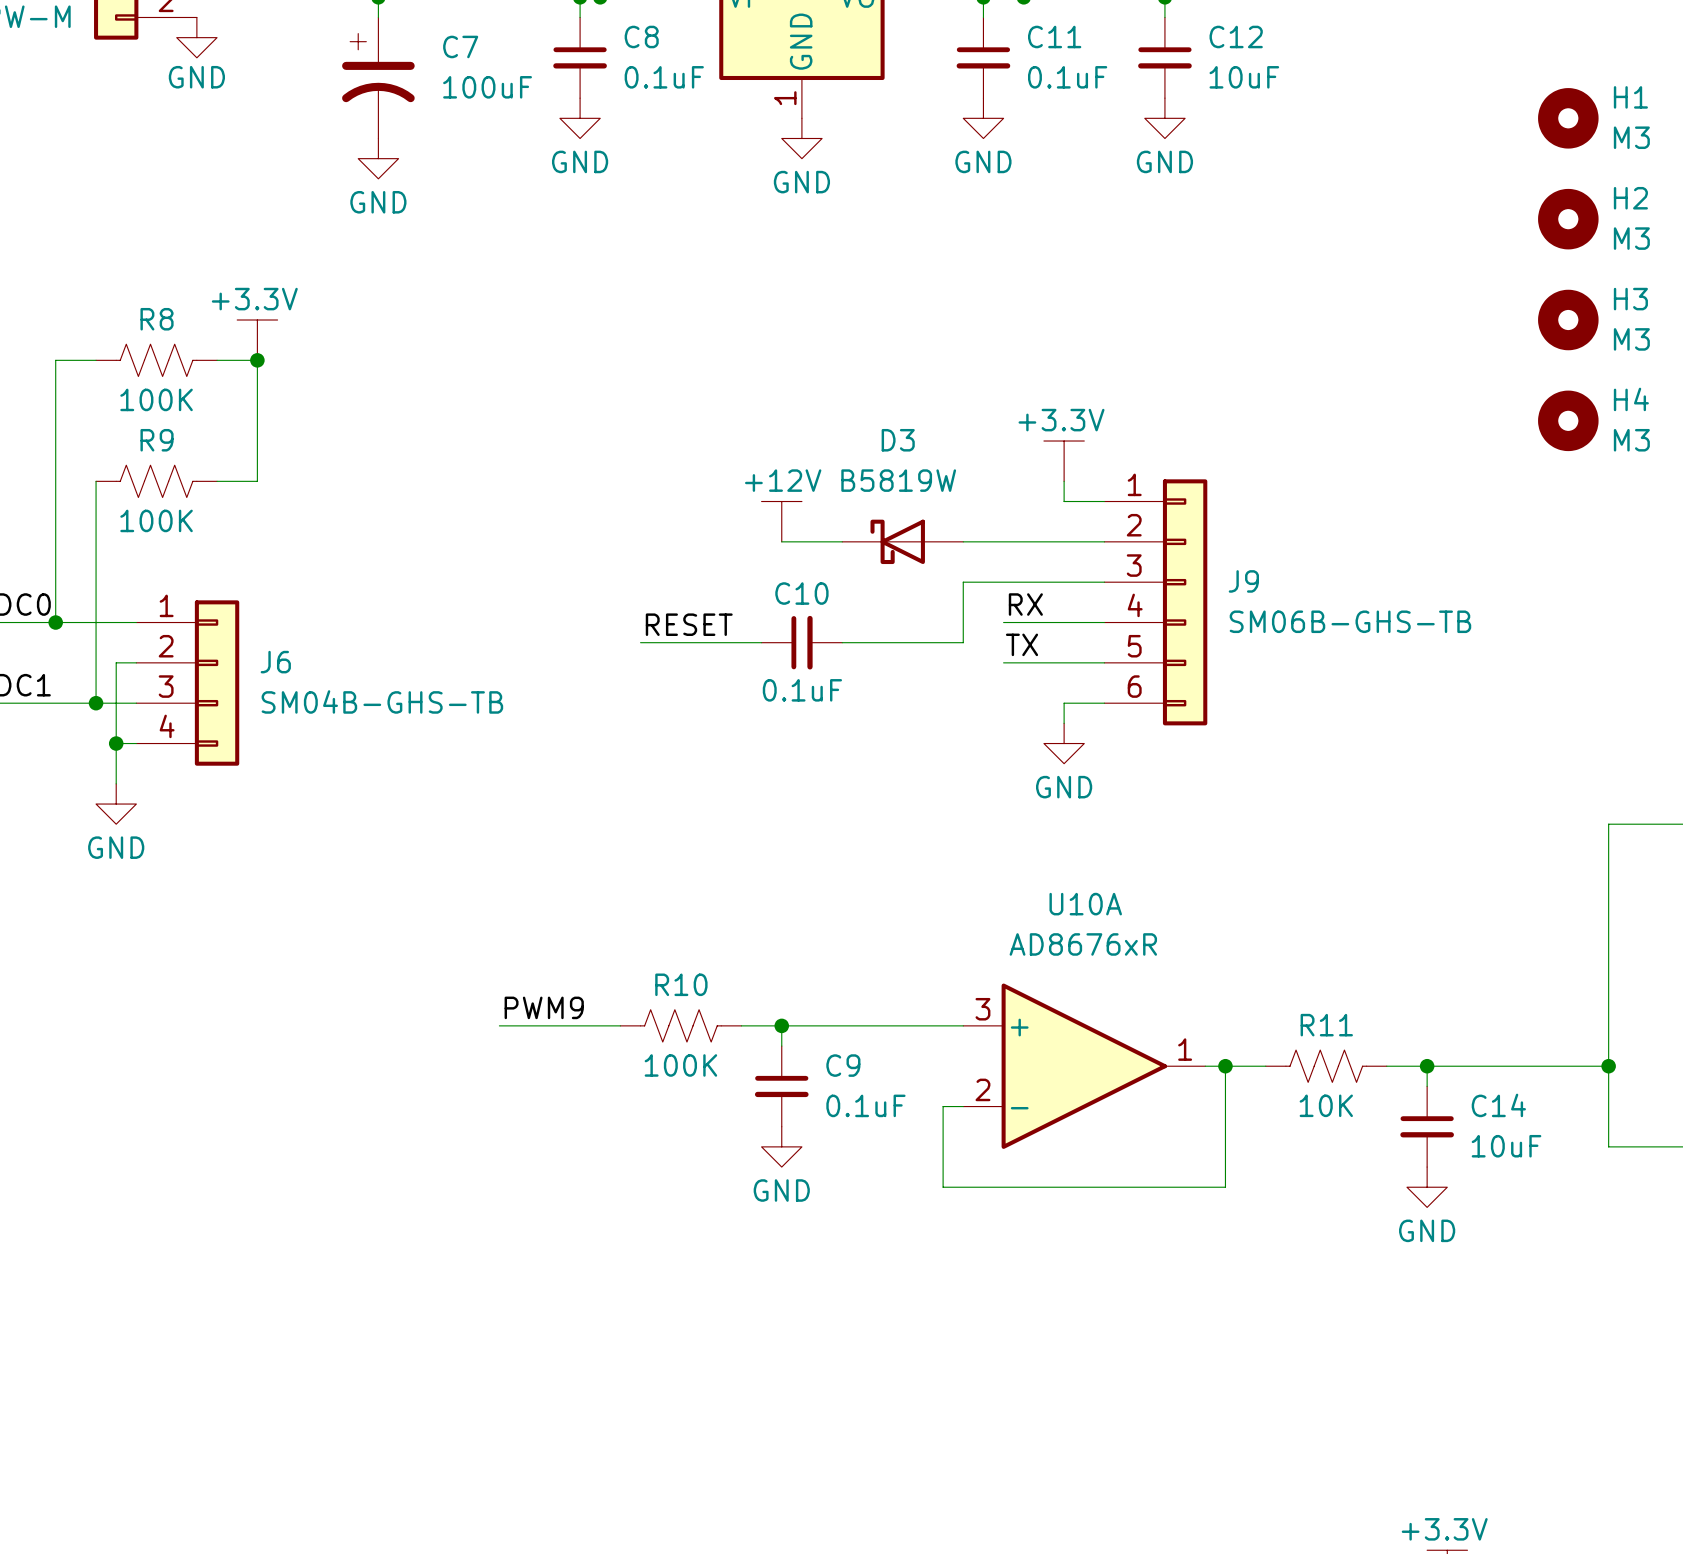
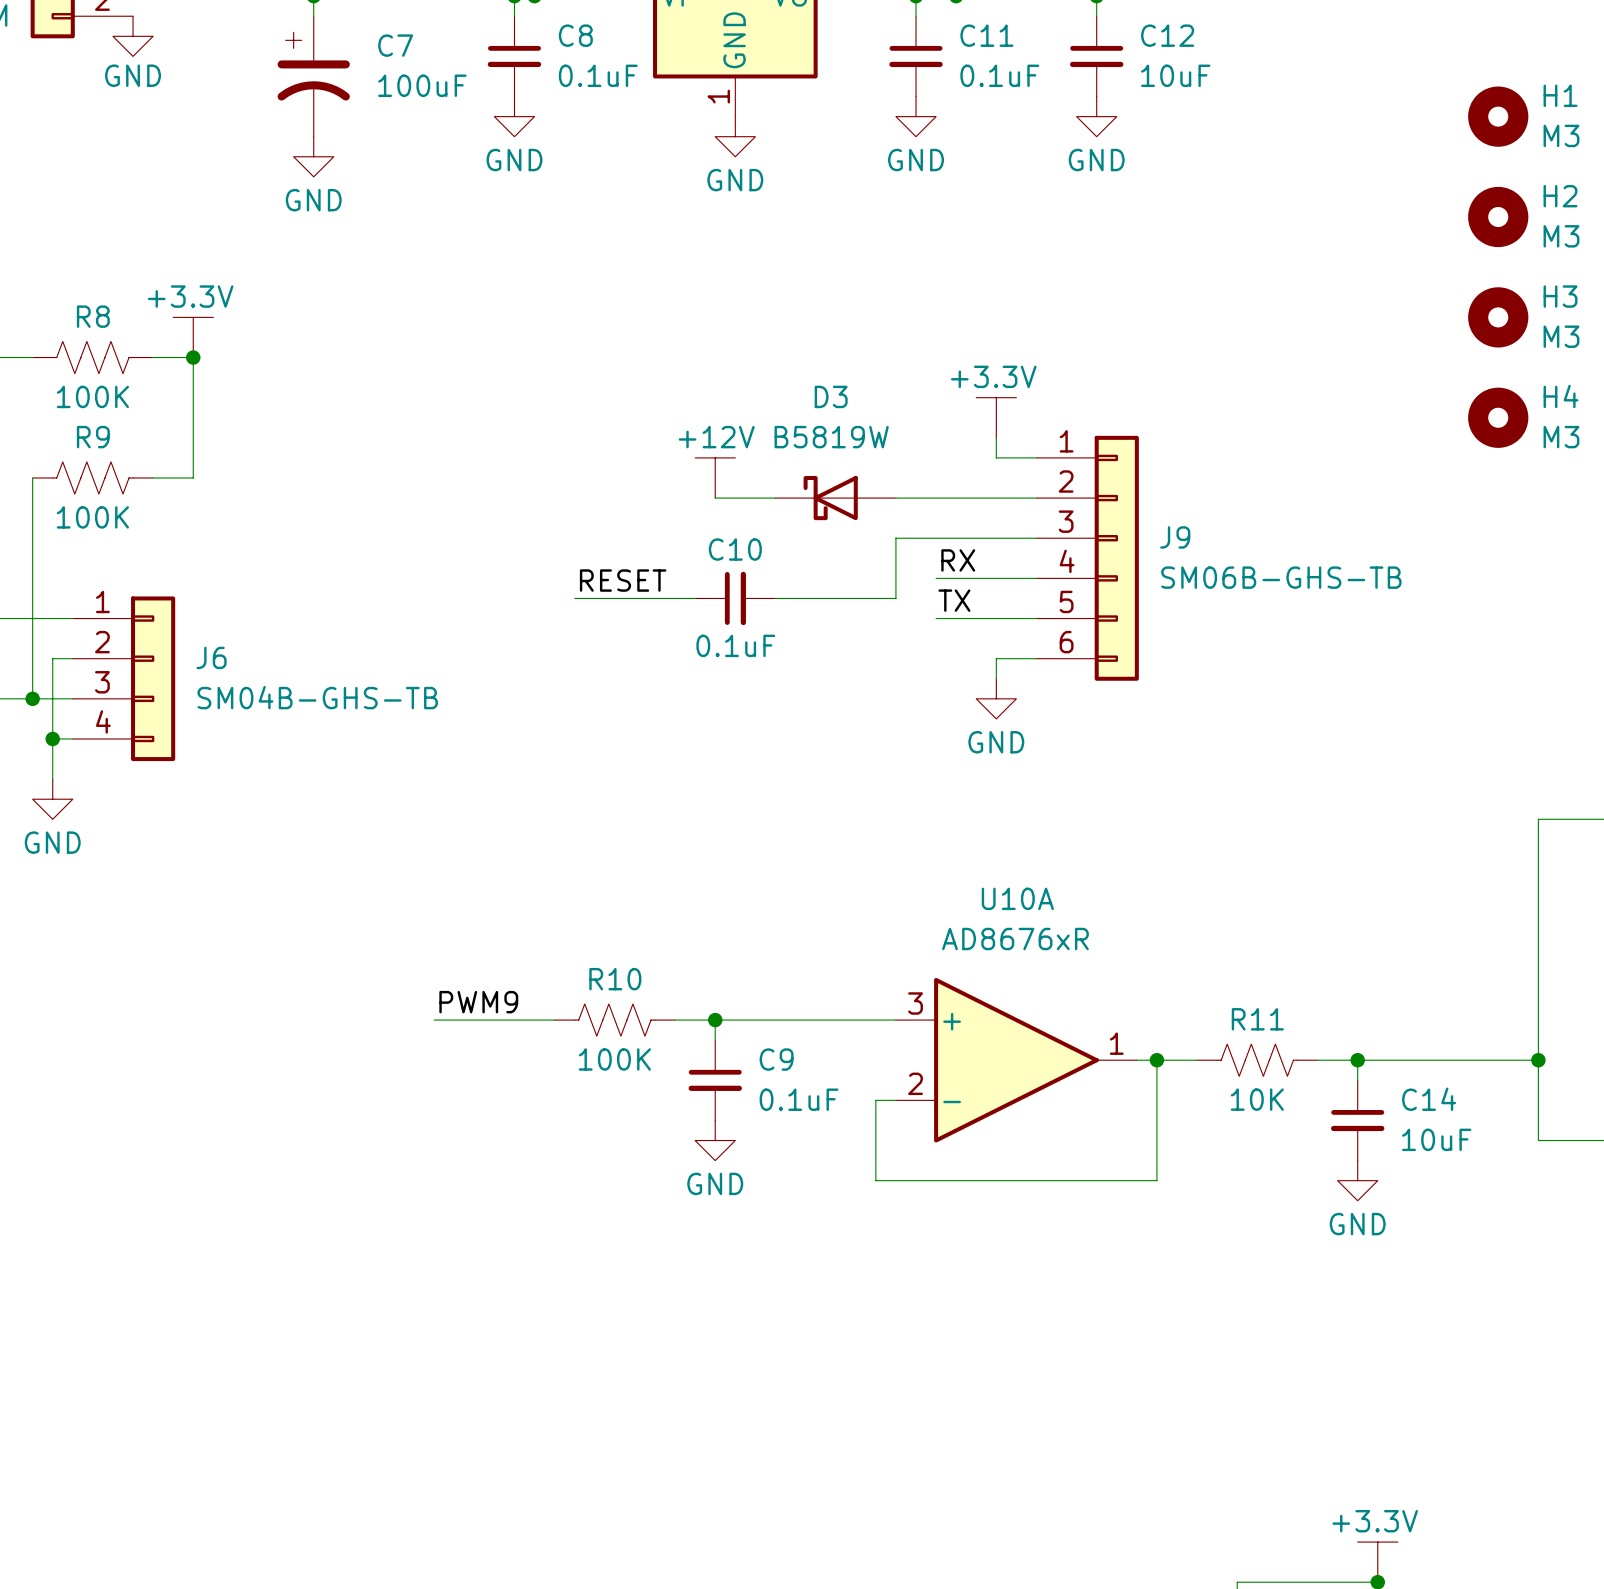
wire: none -> (996, 437) (996, 457) (1036, 457)
power symbol position: +3.3V (1064, 461) -> +3.3V (996, 417)
wire: (1064, 481) (1064, 501) -> (895, 498) (996, 498)
power symbol position: +12V (781, 521) -> +12V (715, 478)
wire: (781, 541) (842, 541) -> (715, 498) (775, 498)
D3 position: (902, 541) -> (835, 498)
label: none -> RX (958, 560)
wire: (963, 582) (1003, 582) -> (895, 578) (895, 538)
wire: (963, 602) (963, 642) (842, 642) -> (895, 598) (775, 598)
J9 position: (1155, 602) -> (1087, 558)
label: RX (1025, 604) -> TX (954, 600)
label position: RESET (689, 624) -> RESET (623, 580)
wire: (640, 642) (761, 642) -> (574, 598) (695, 598)
C10 position: (801, 642) -> (735, 598)
label: TX (1022, 644) -> none
wire: (1003, 662) (1064, 662) -> (996, 678) (996, 658)
wire: (1104, 703) (1064, 703) (1064, 723) -> none
power symbol position: GND (1064, 743) -> GND (996, 698)

